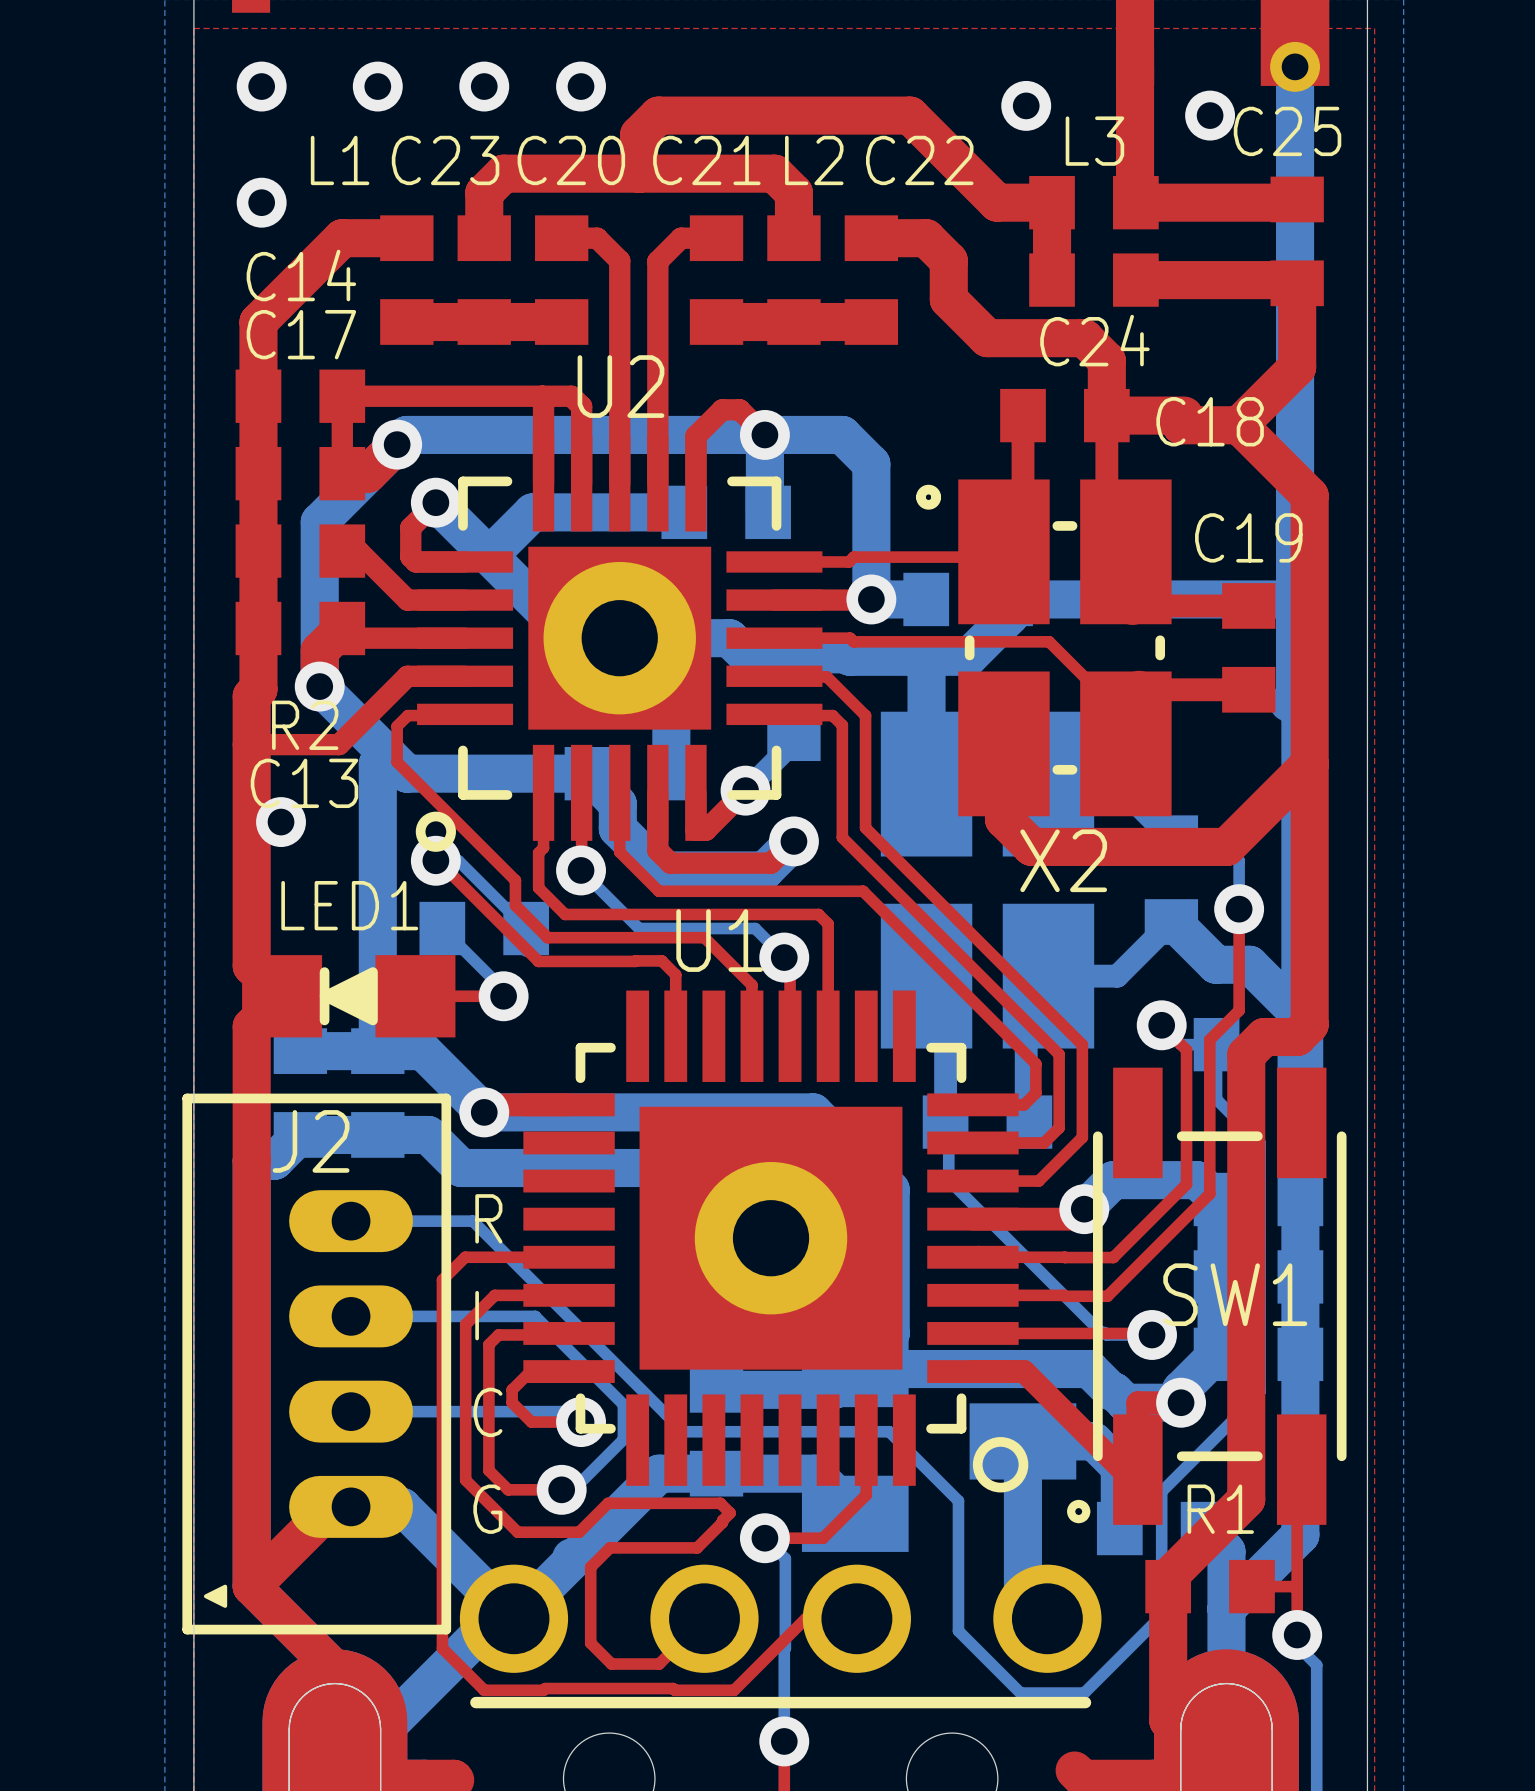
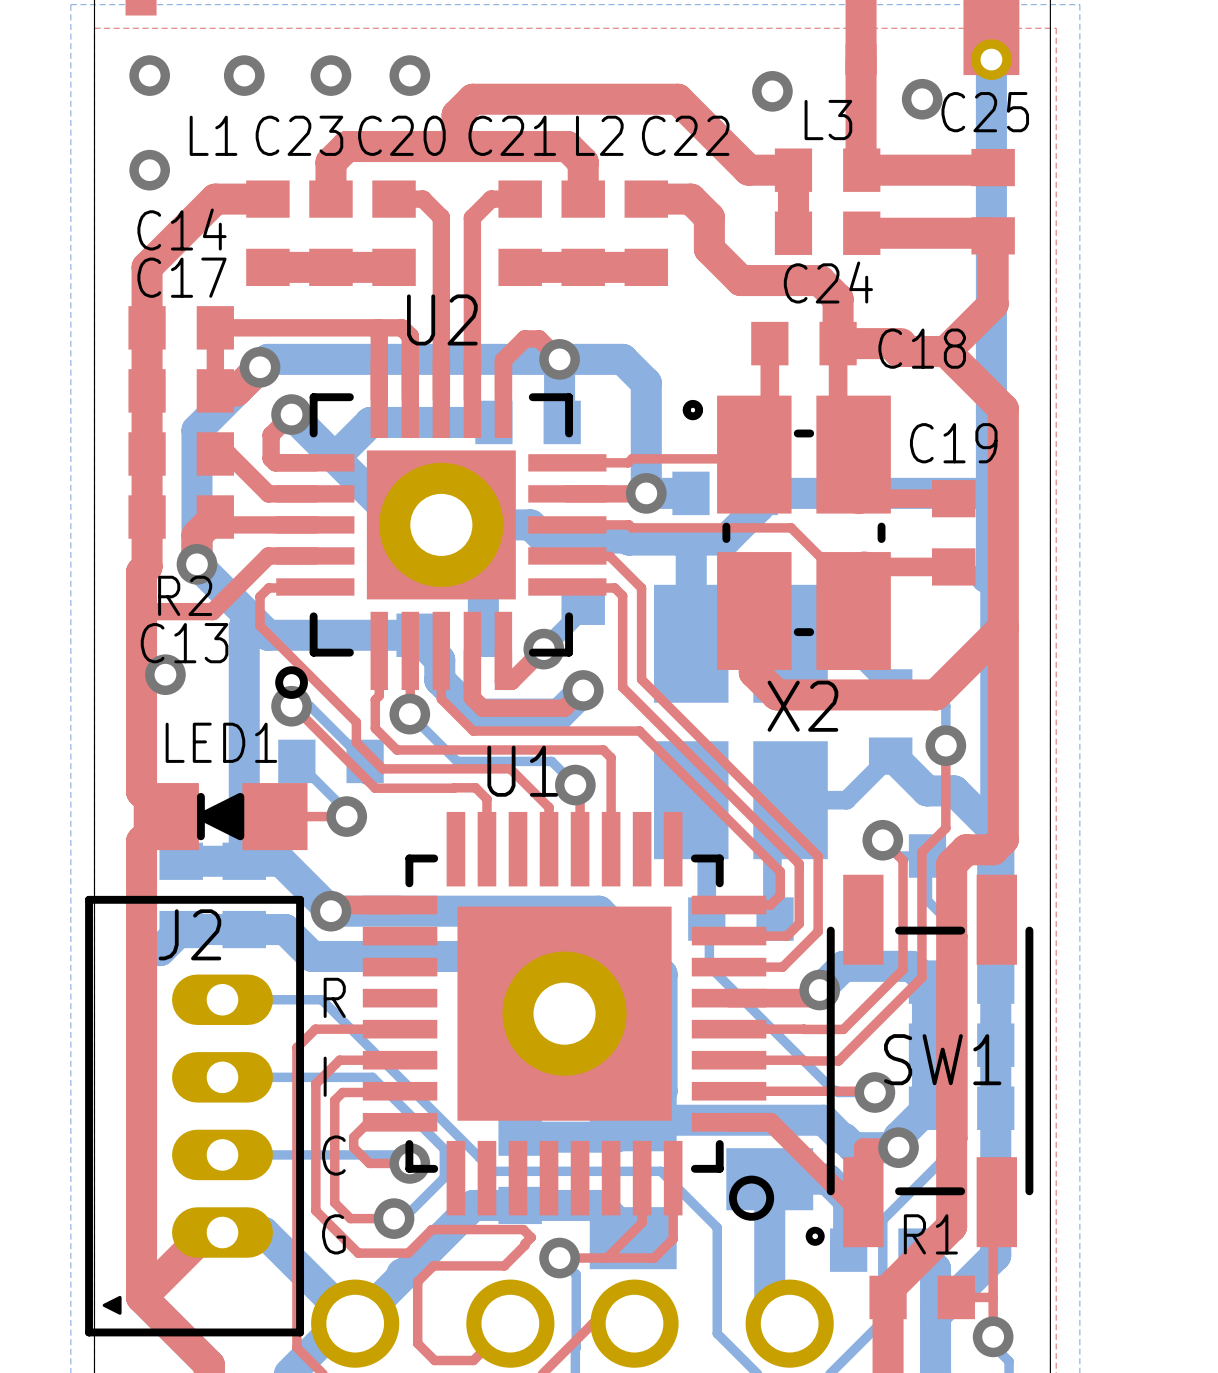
top track: none -> (673, 1178) (673, 1239) (654, 1258) (606, 1258)

